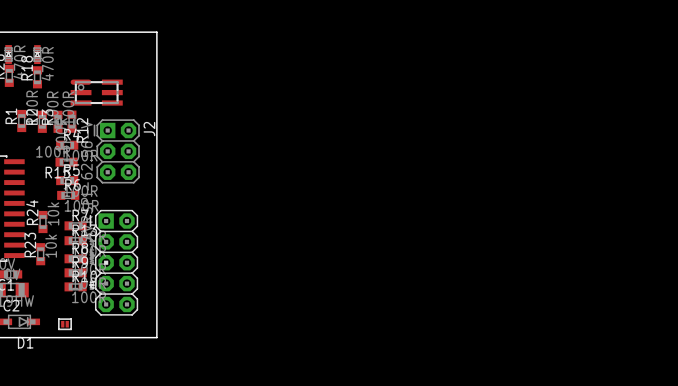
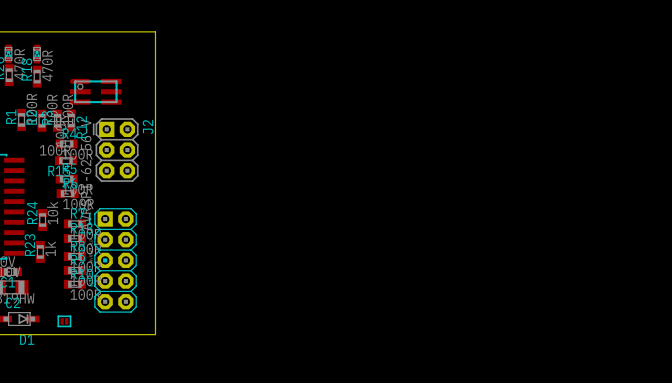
R23 value: 10k (51, 246) -> 1k (50, 248)

